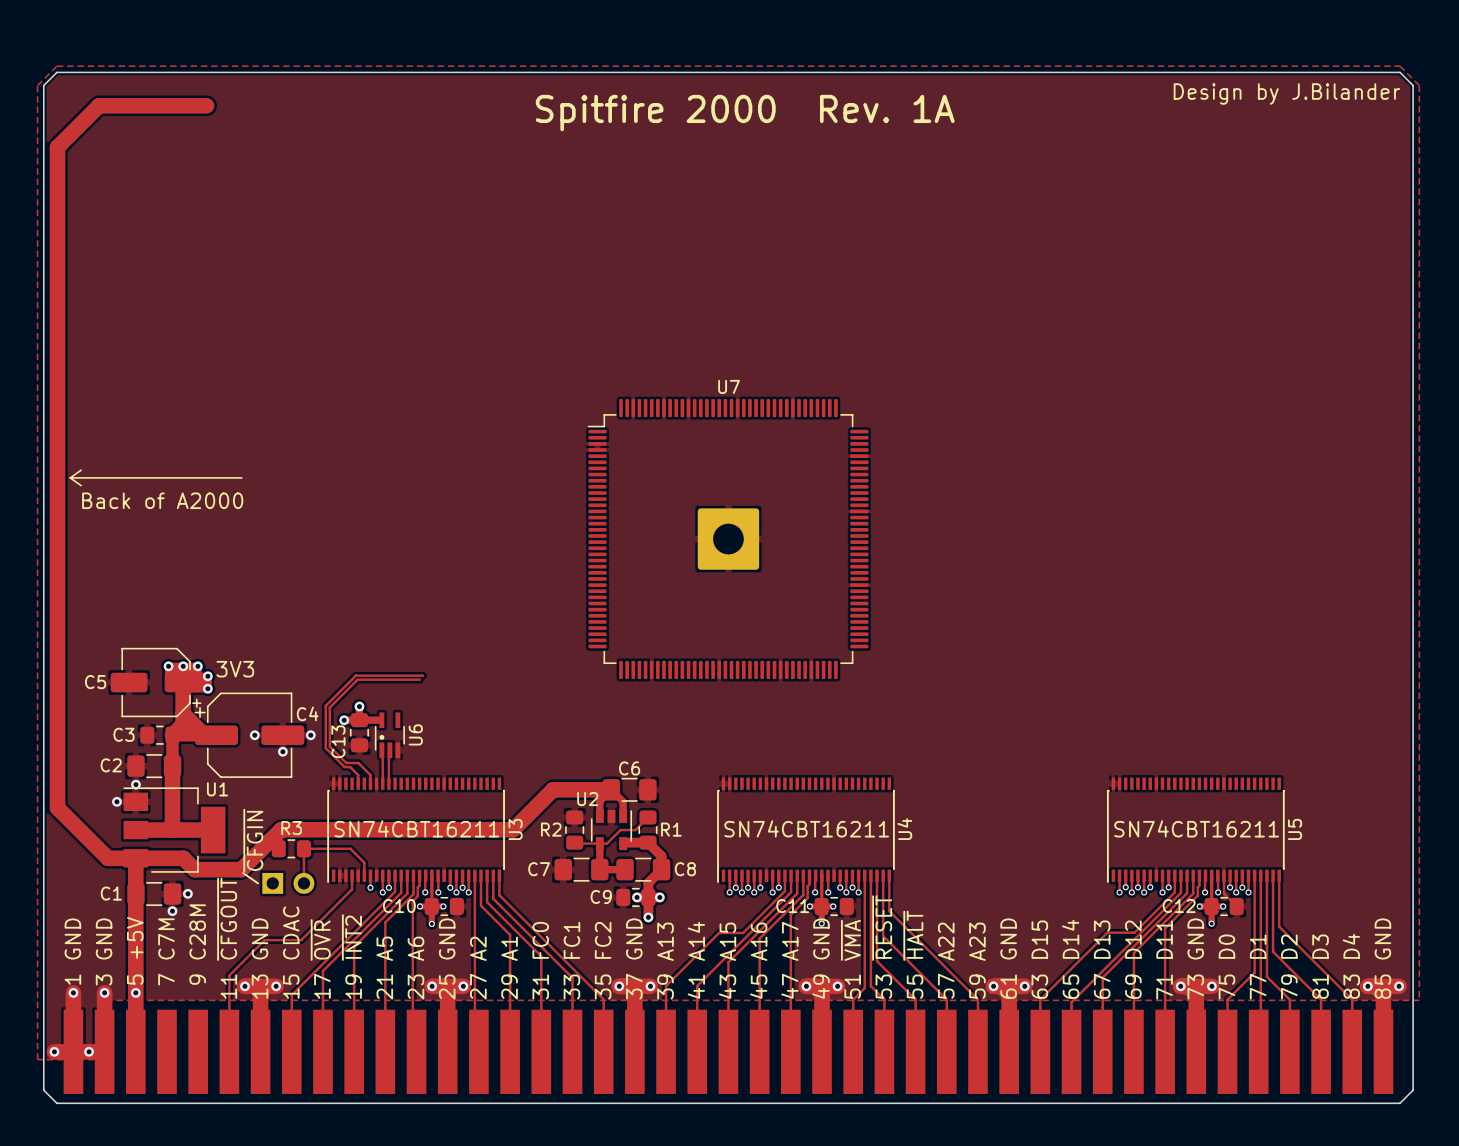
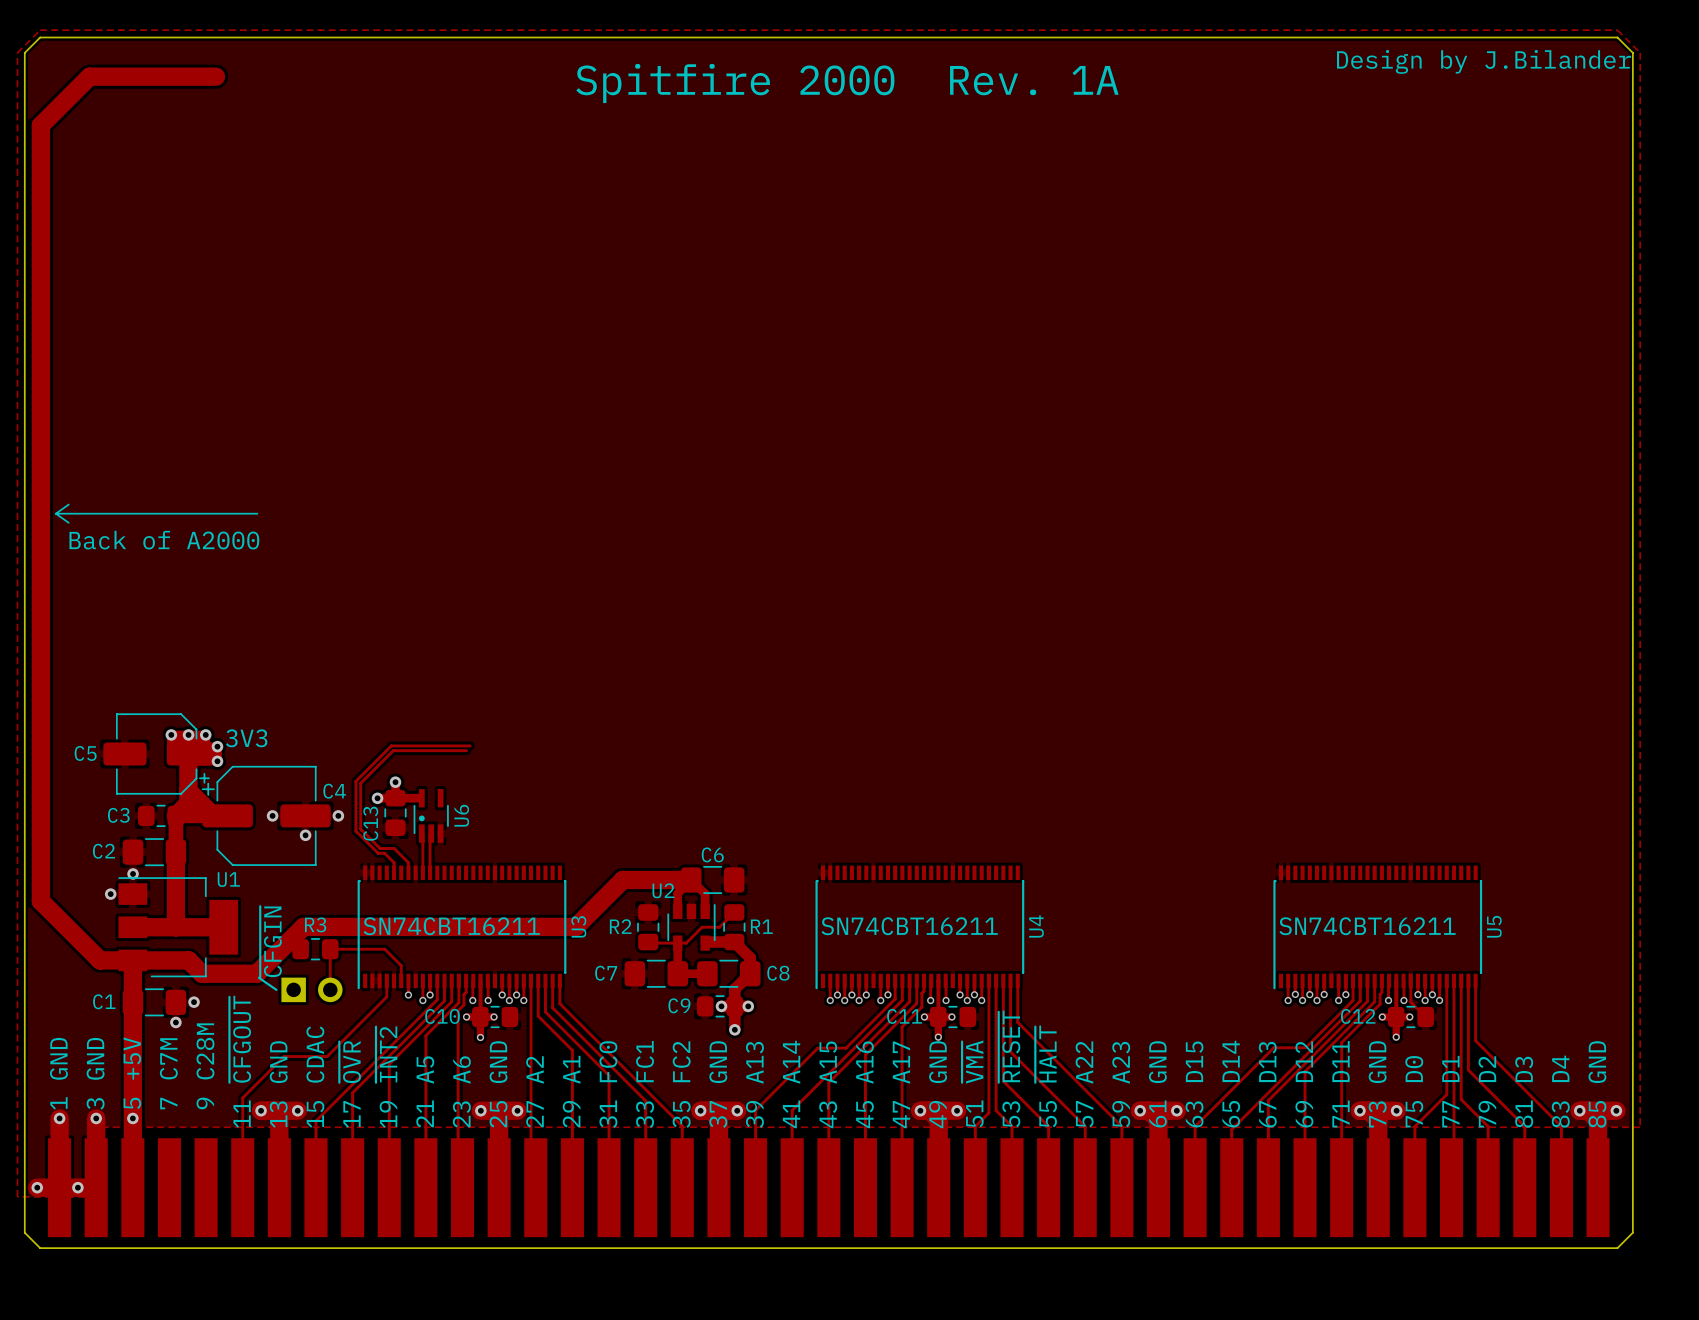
U7: (728, 539) -> none

